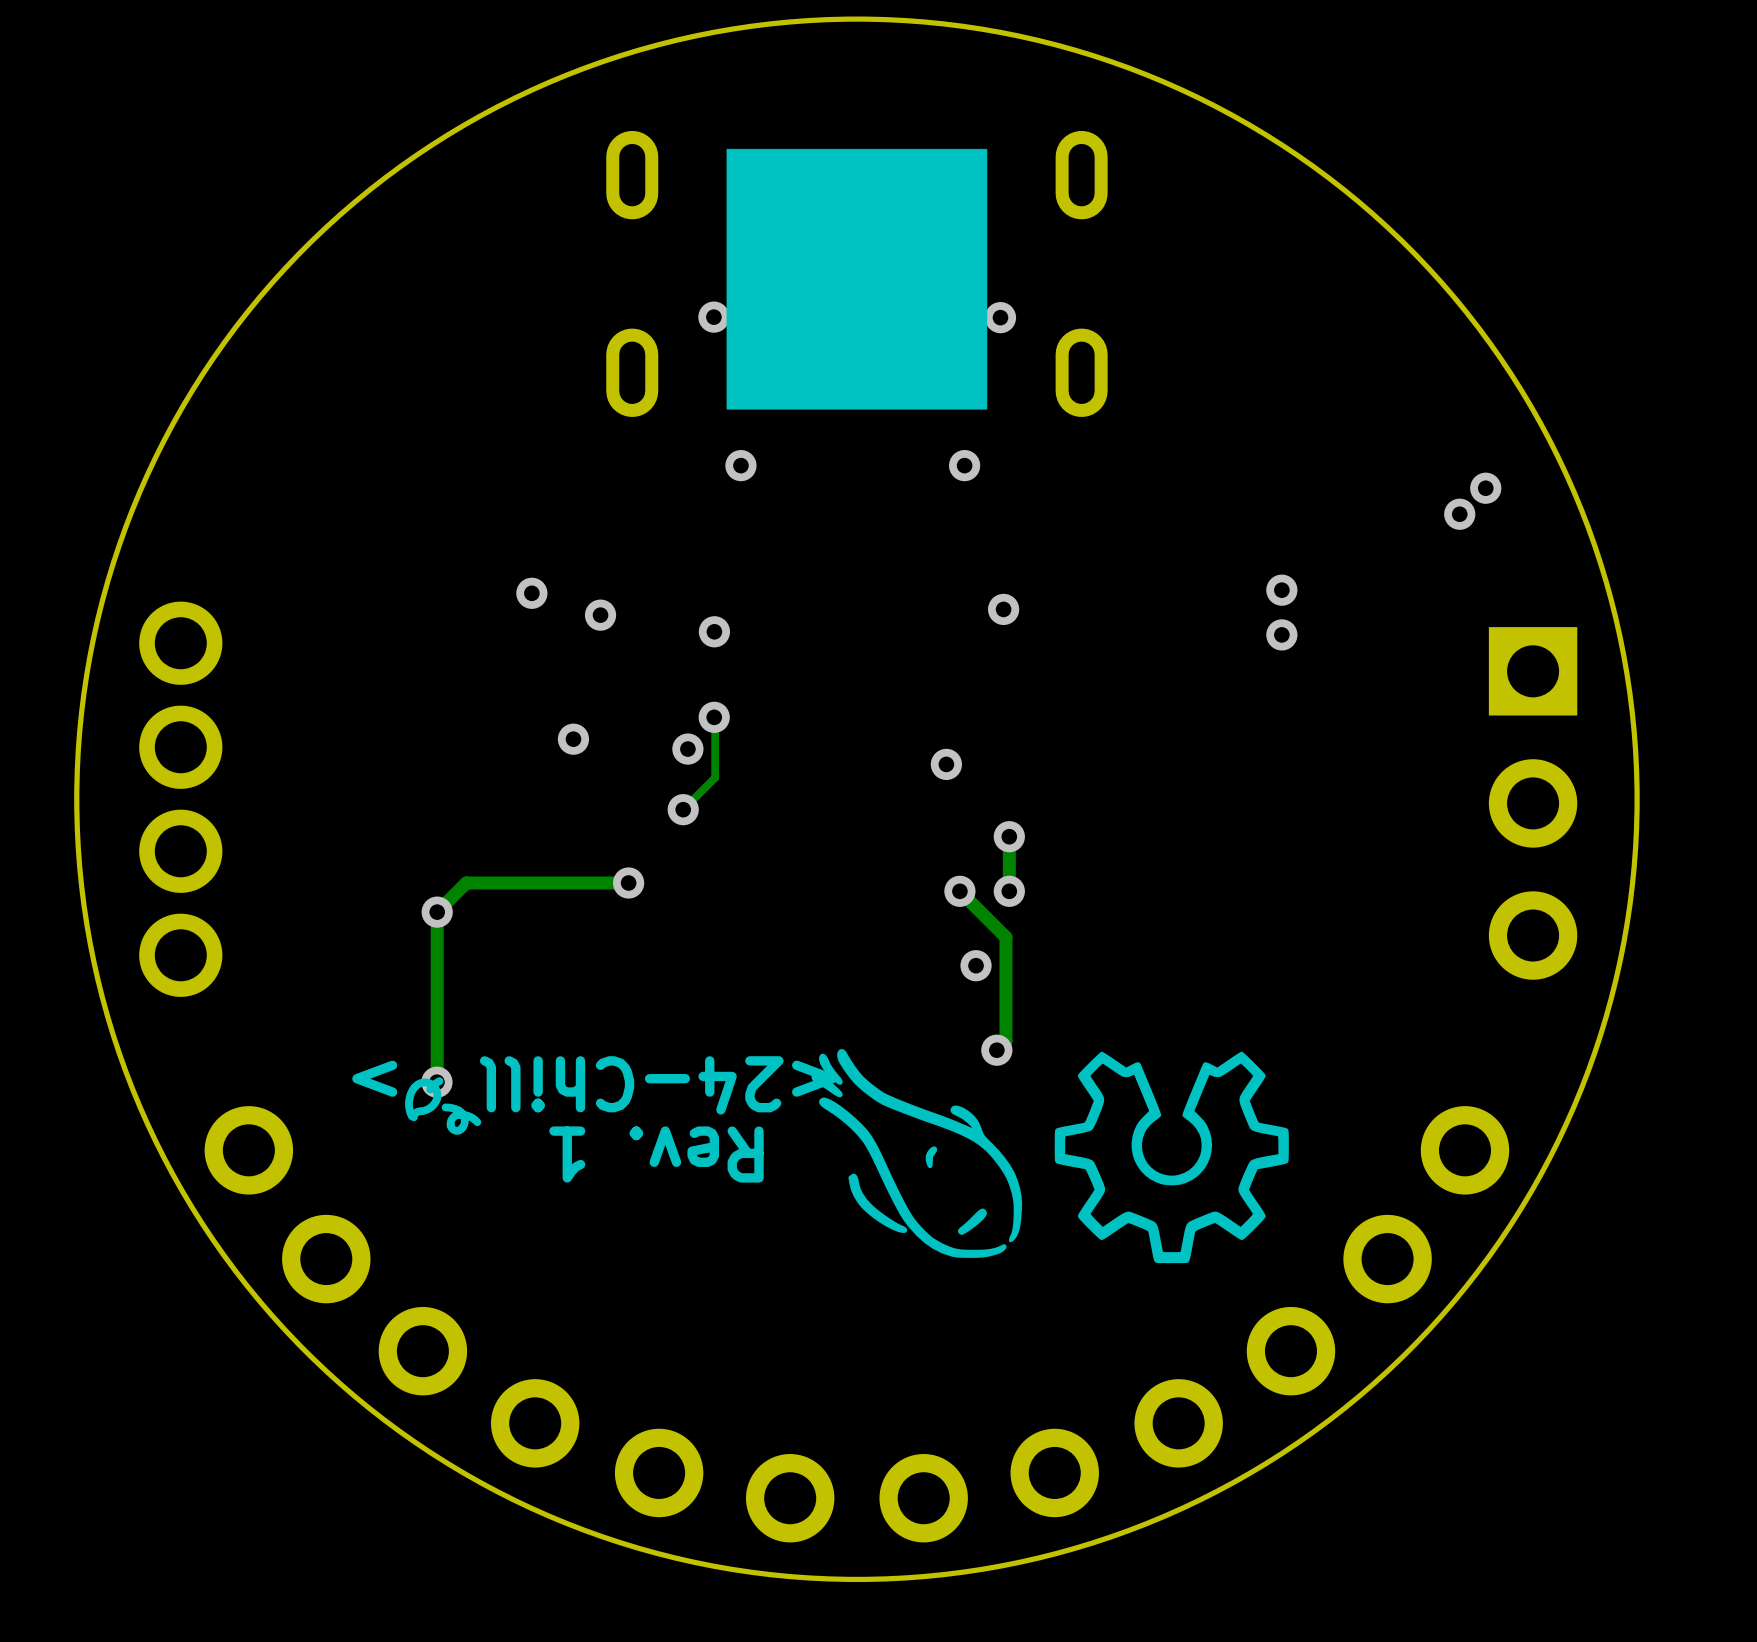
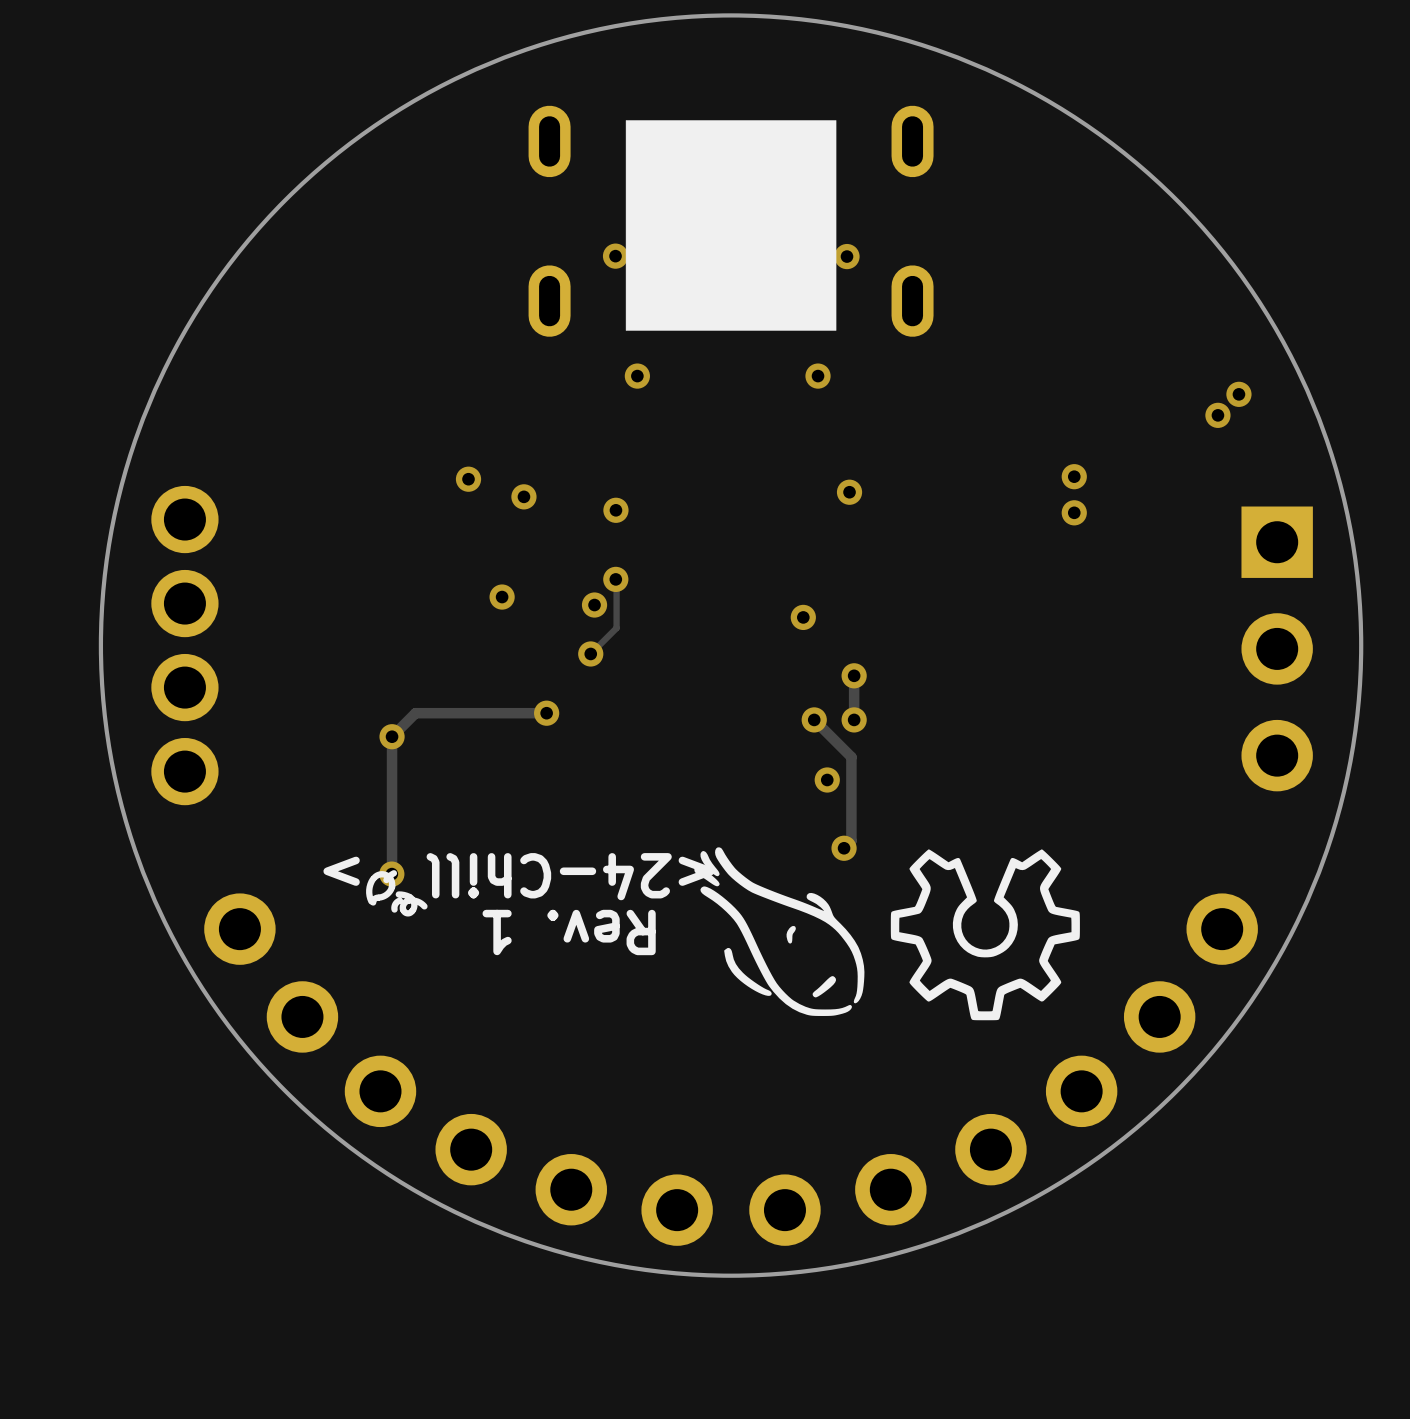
line: none -> (399, 900) (395, 904) (394, 909)

